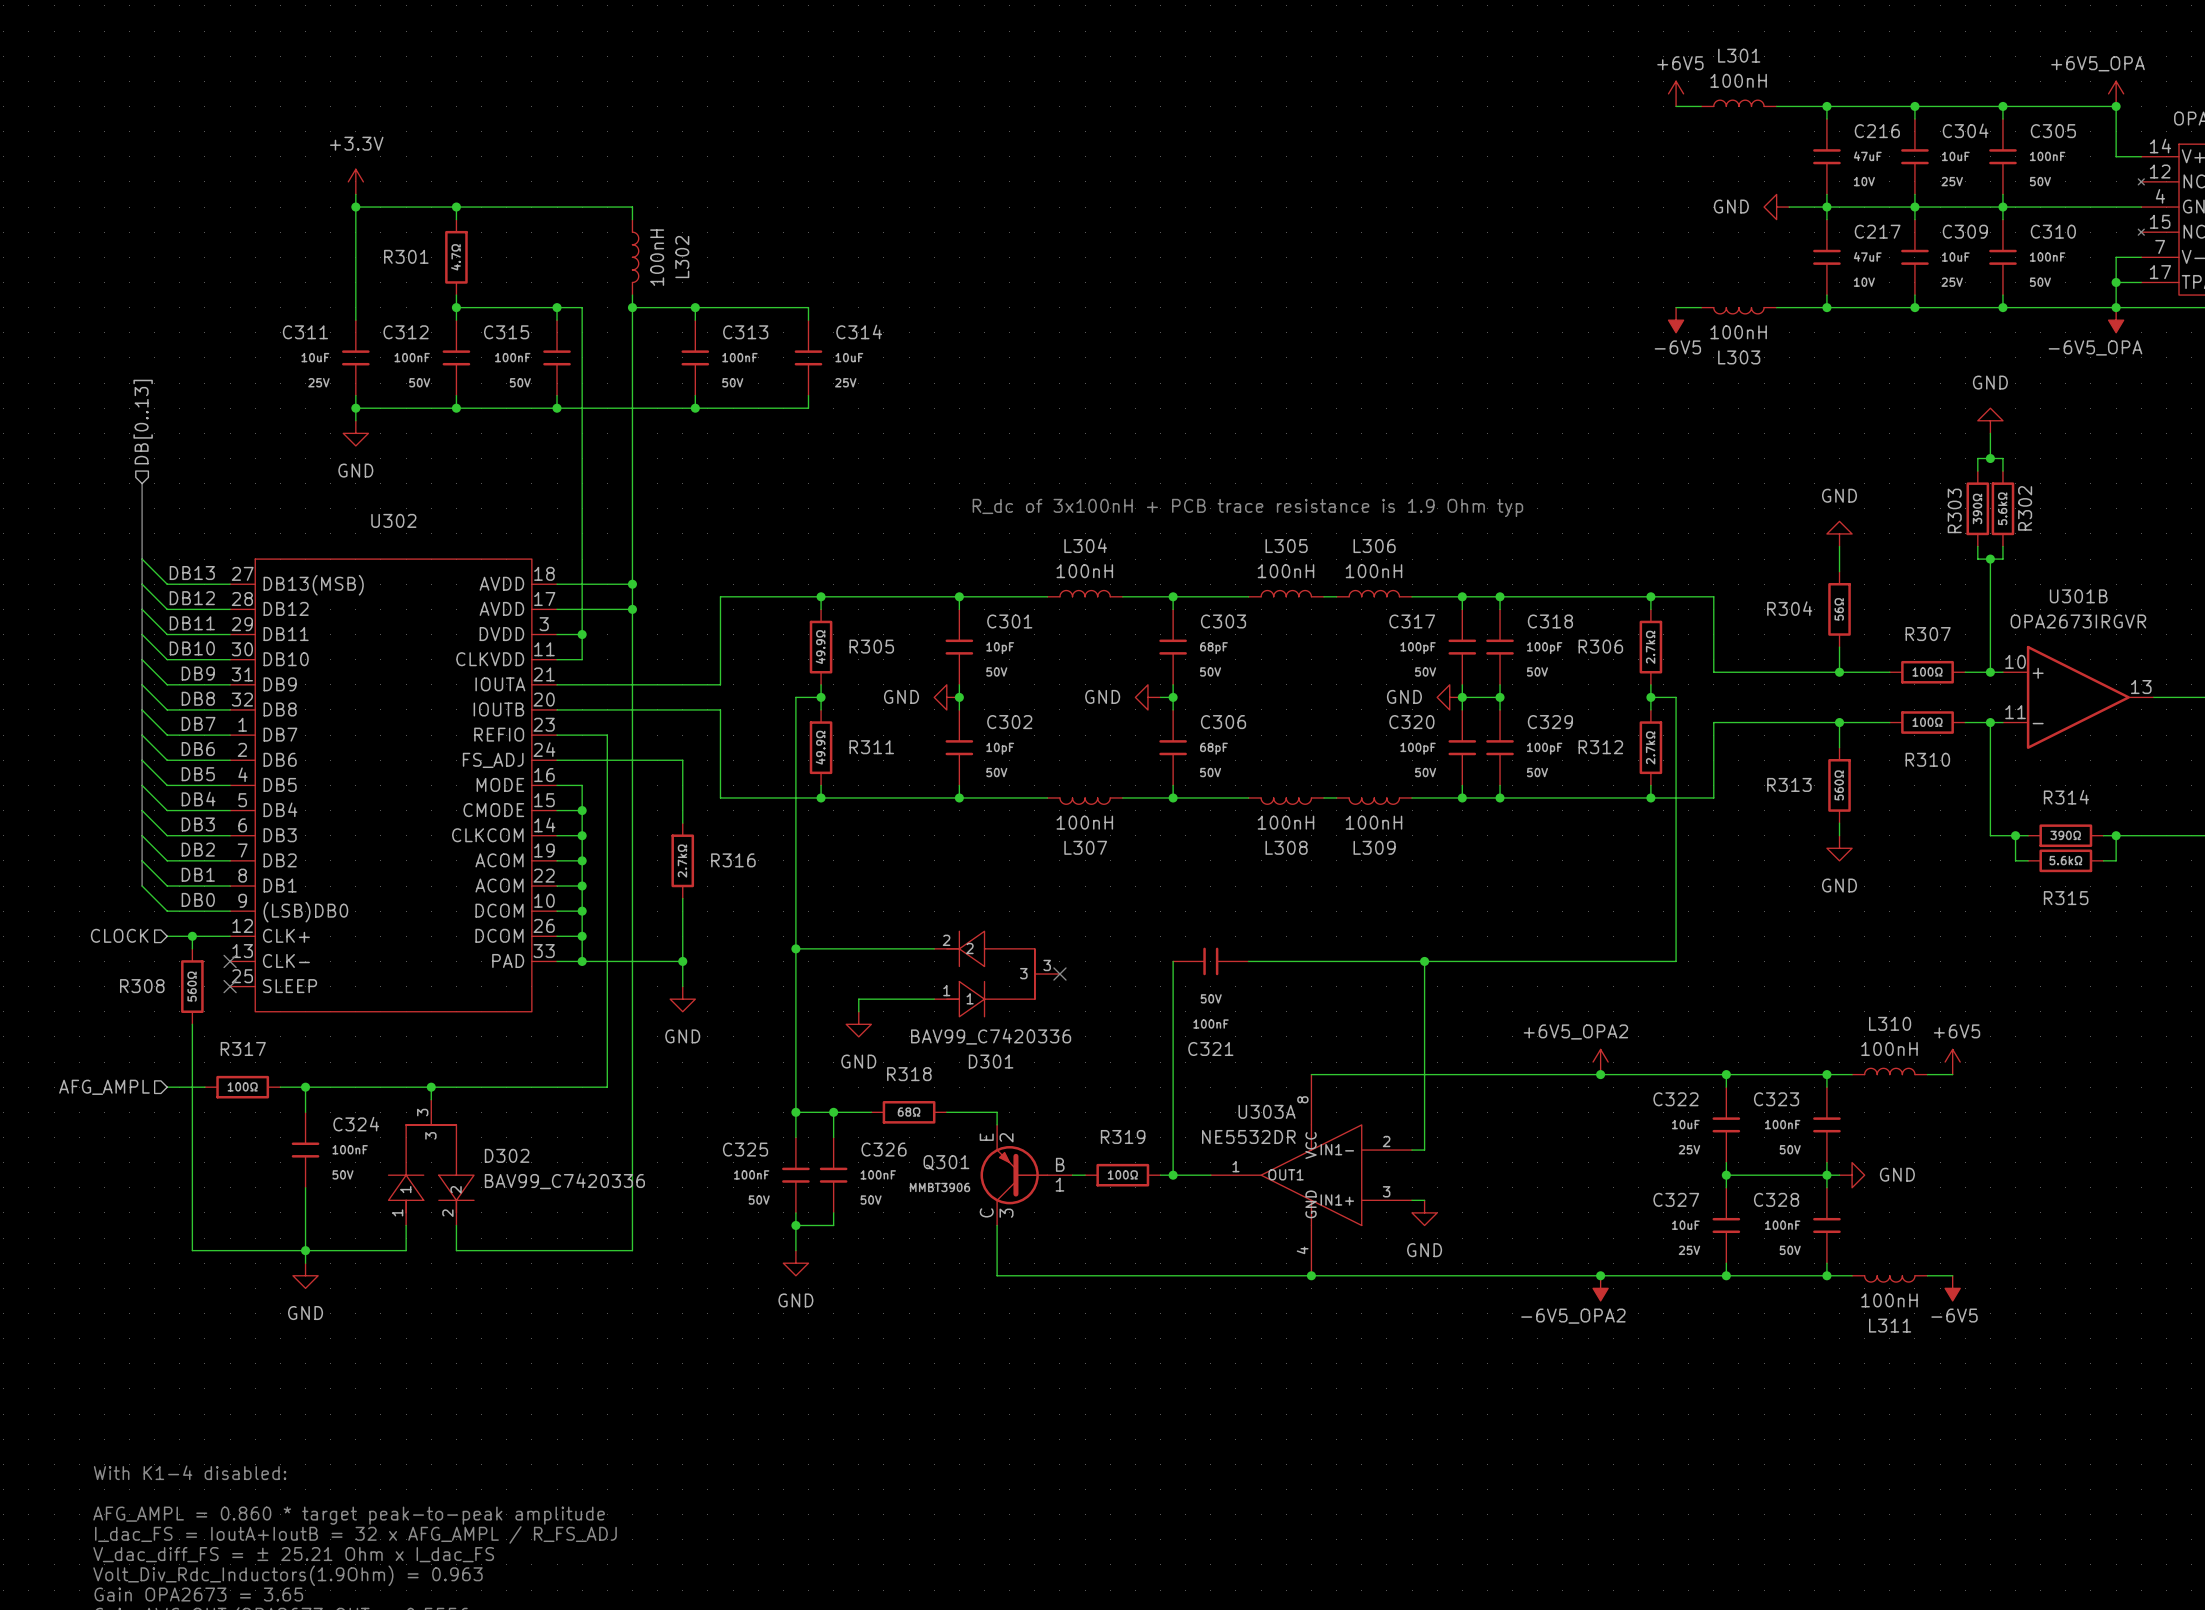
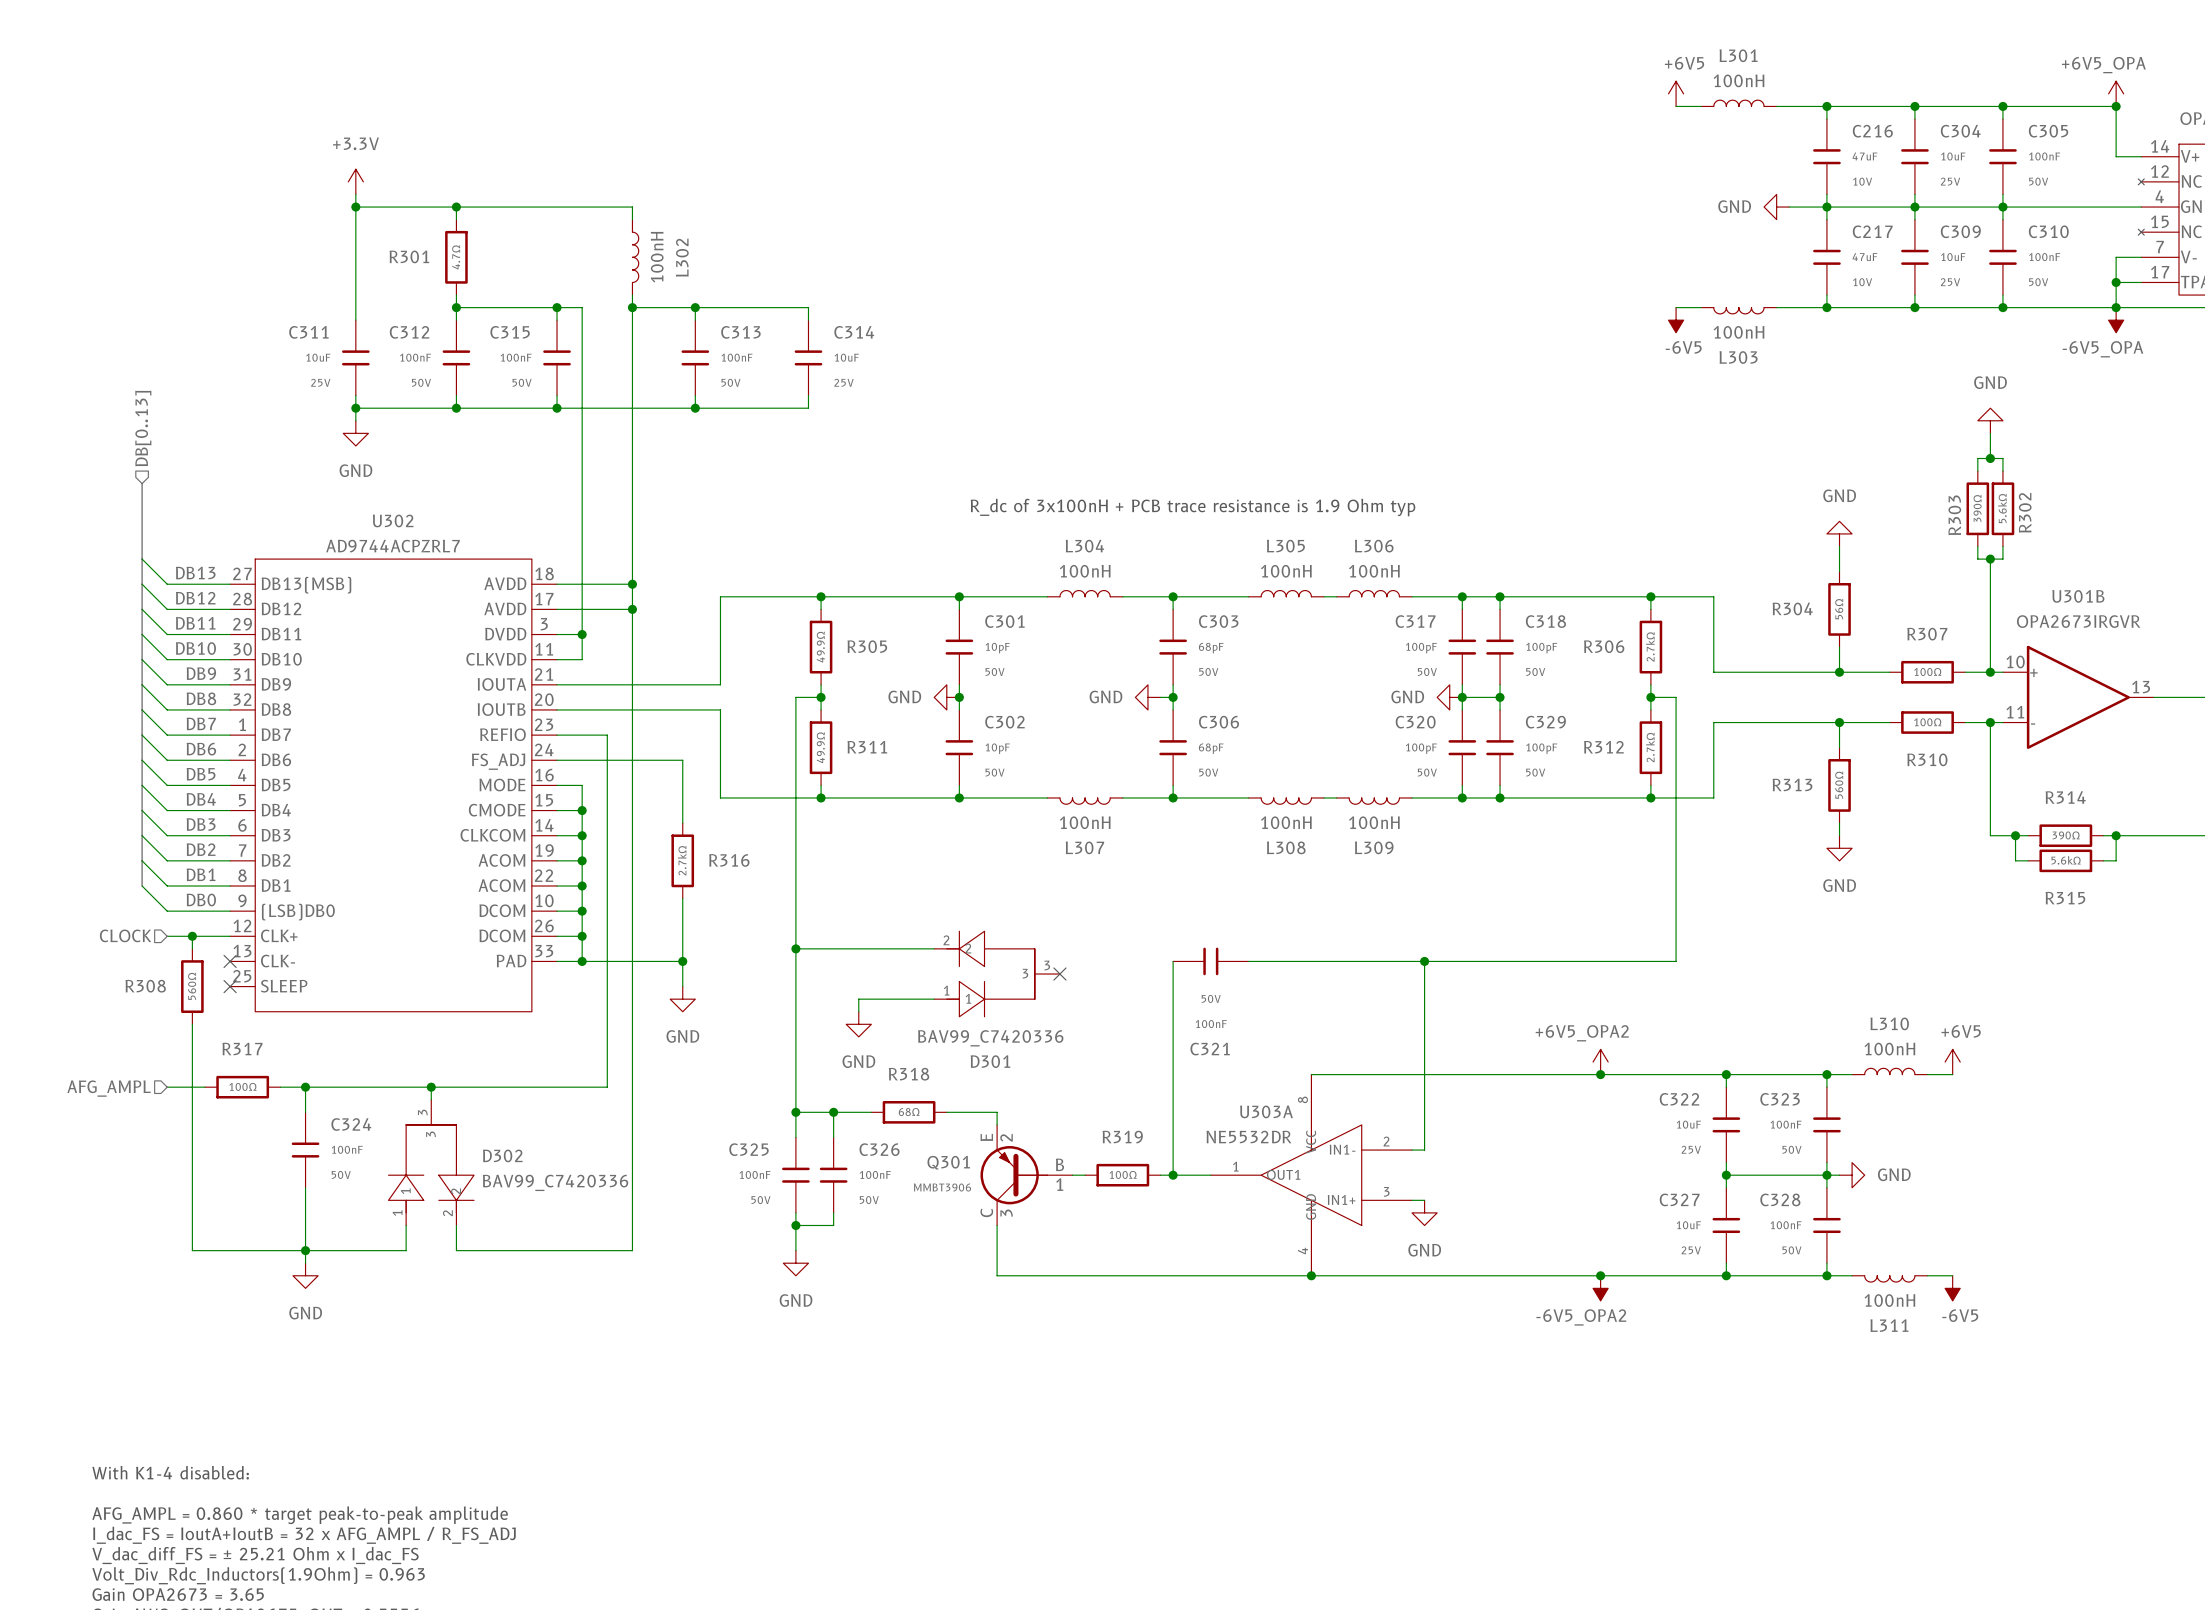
U302 value: none -> AD9744ACPZRL7 (392, 546)

